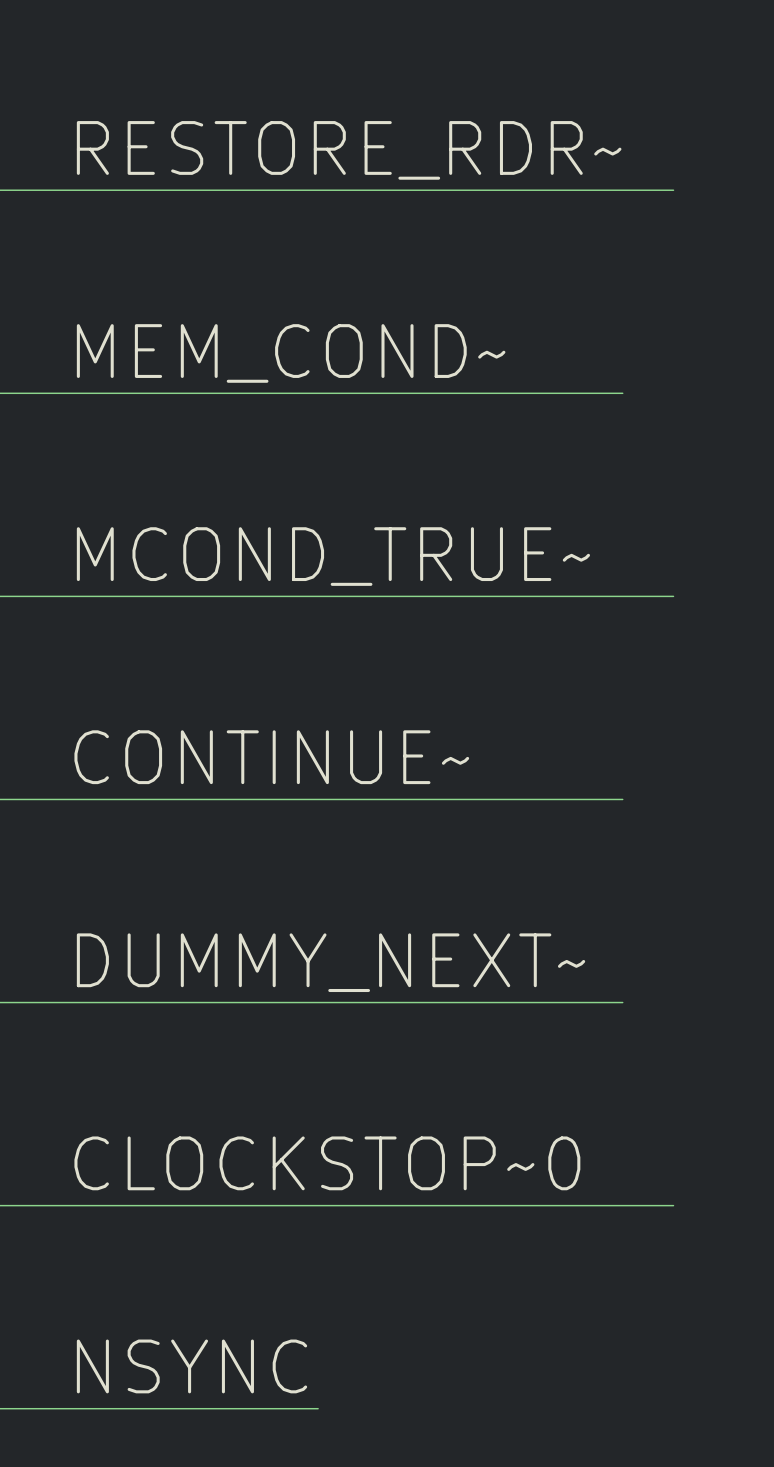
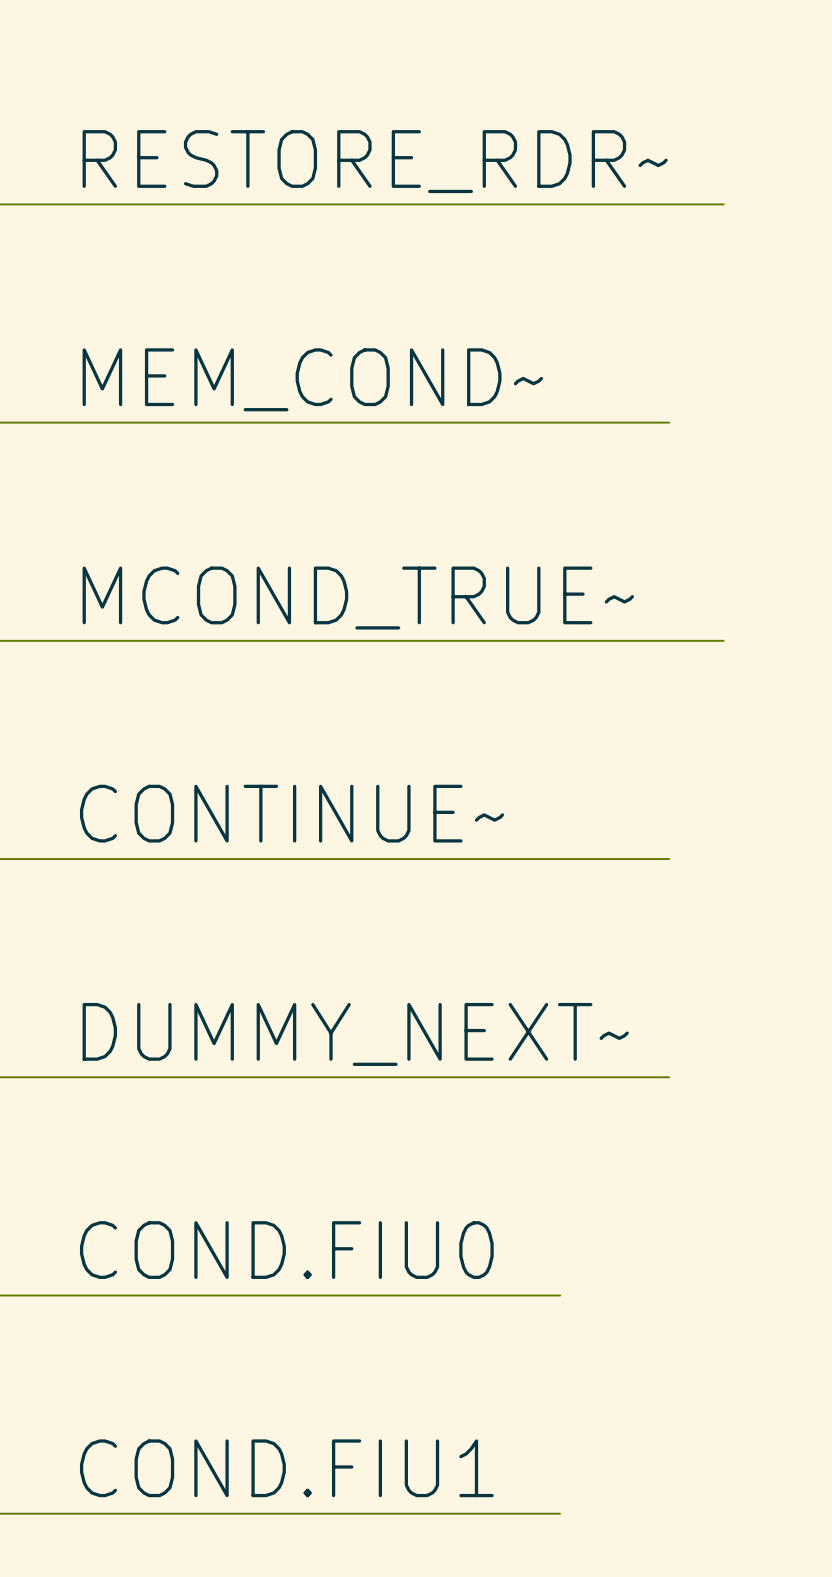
label: CLOCKSTOP~0 (327, 1163) -> COND.FIU0 (286, 1250)
wire: (521, 1205) (673, 1205) -> none
label: NSYNC (192, 1366) -> COND.FIU1 (286, 1468)
wire: none -> (341, 1513) (560, 1513)

